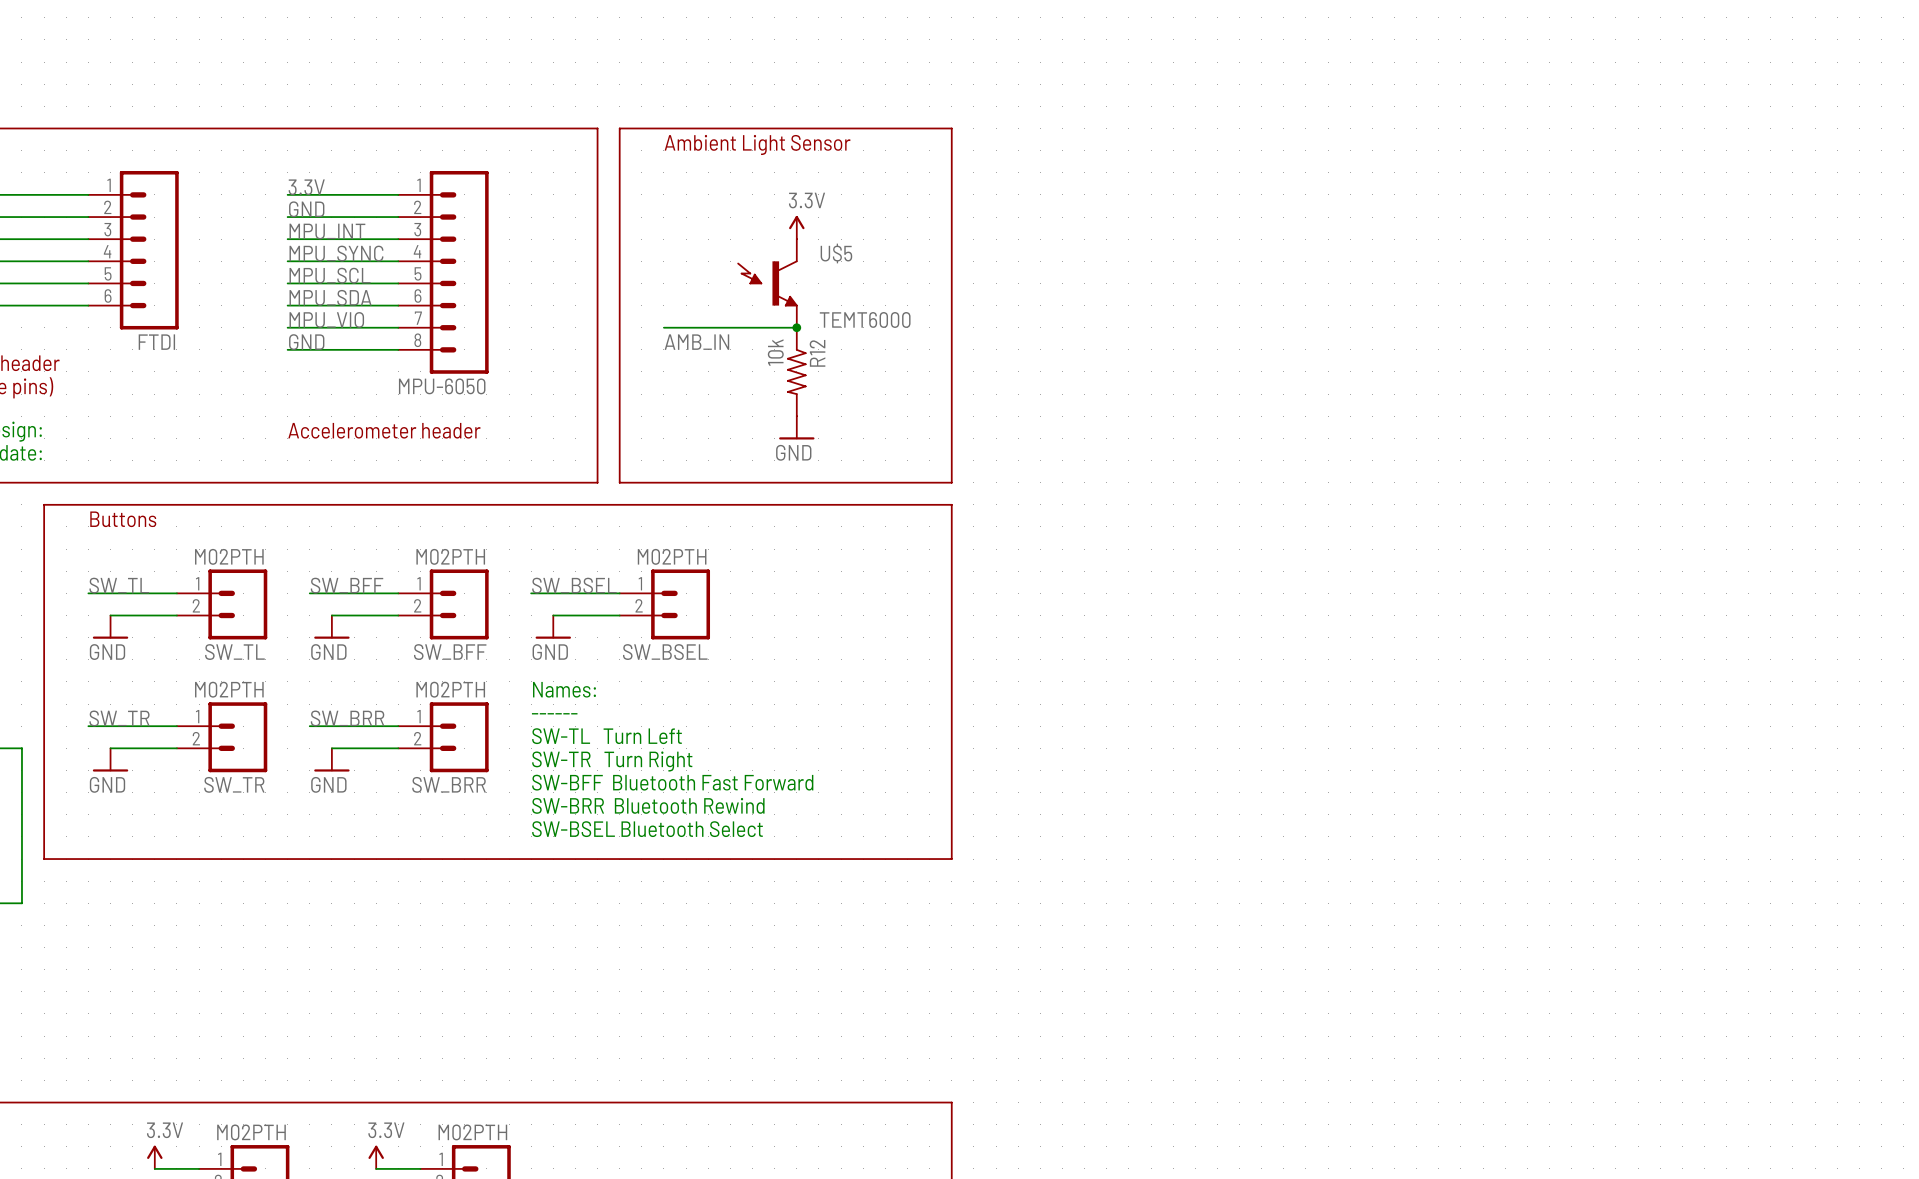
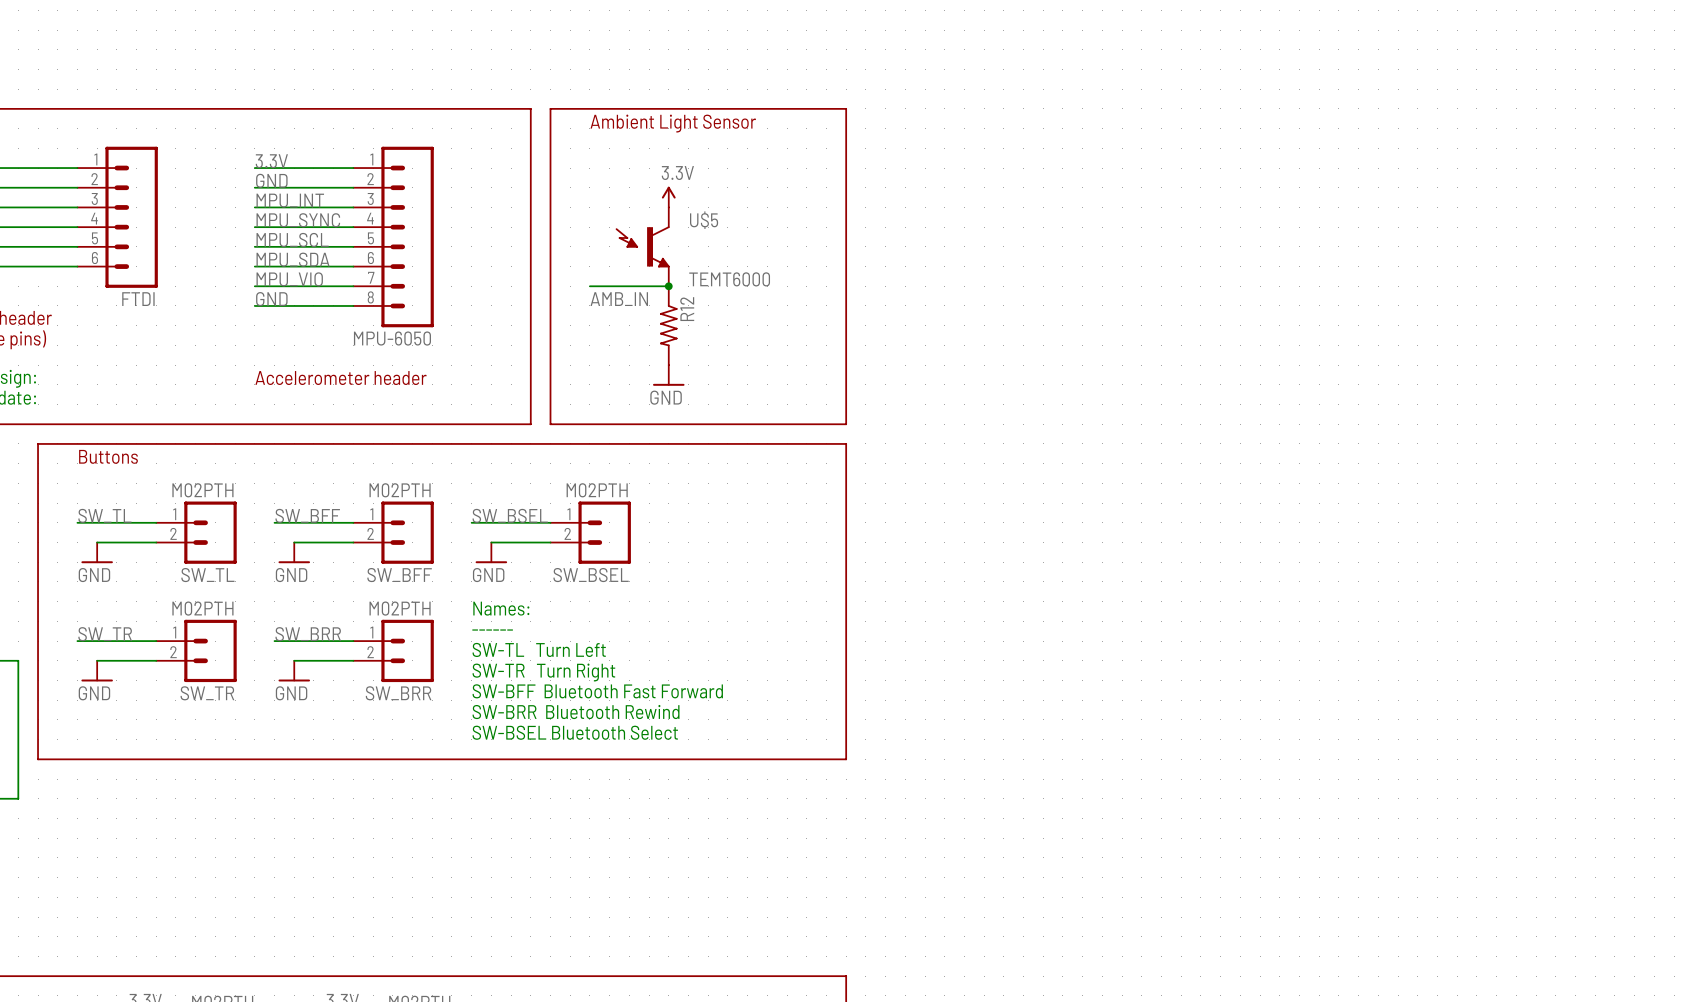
power symbol position: 3.3V (796, 227) -> 3.3V (668, 197)
U$5 position: (767, 283) -> (642, 246)
wire: (752, 327) (796, 327) -> none
junction position: (796, 327) -> (668, 286)
R12 value: 10k (775, 352) -> none
R12 position: (796, 371) -> (668, 325)
power symbol position: GND (796, 427) -> GND (668, 375)

